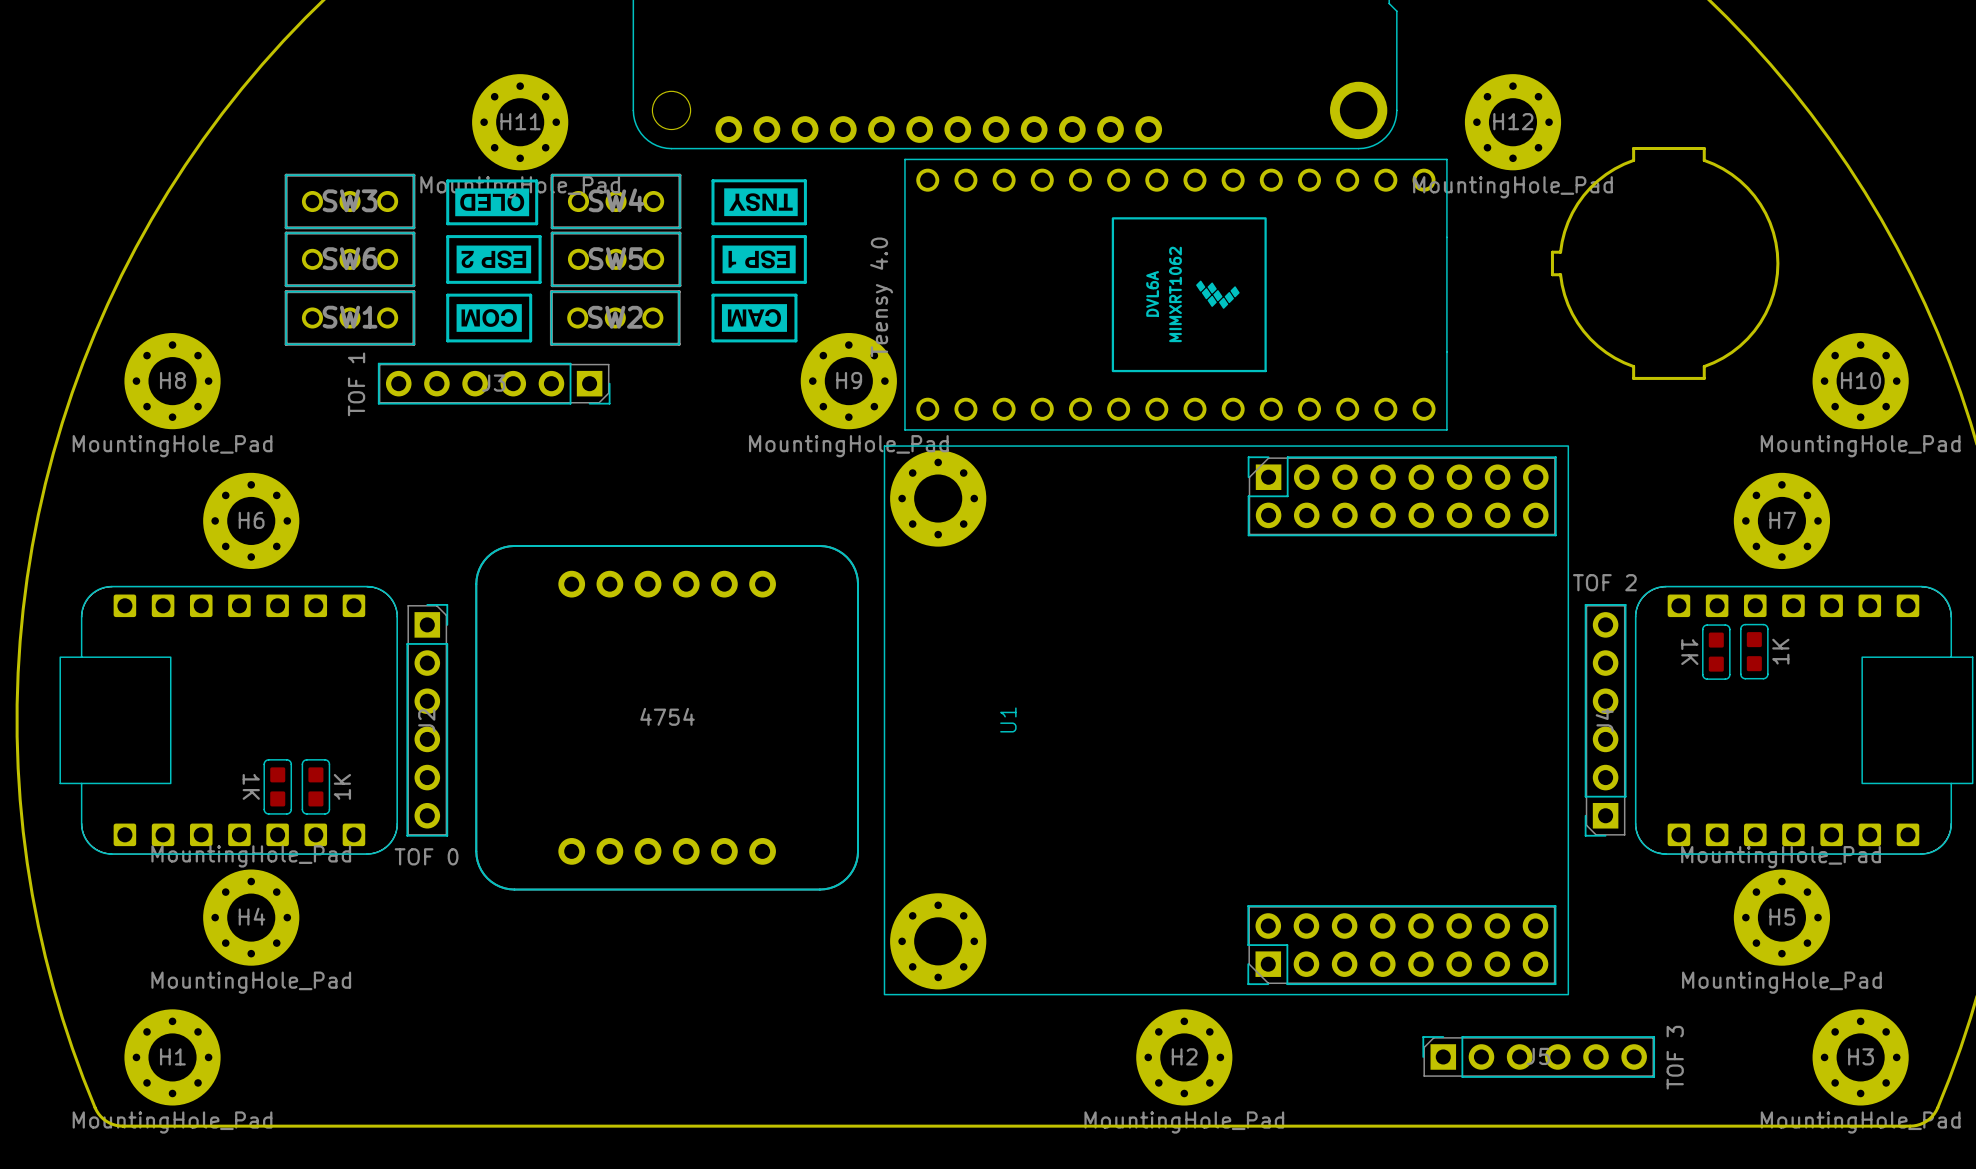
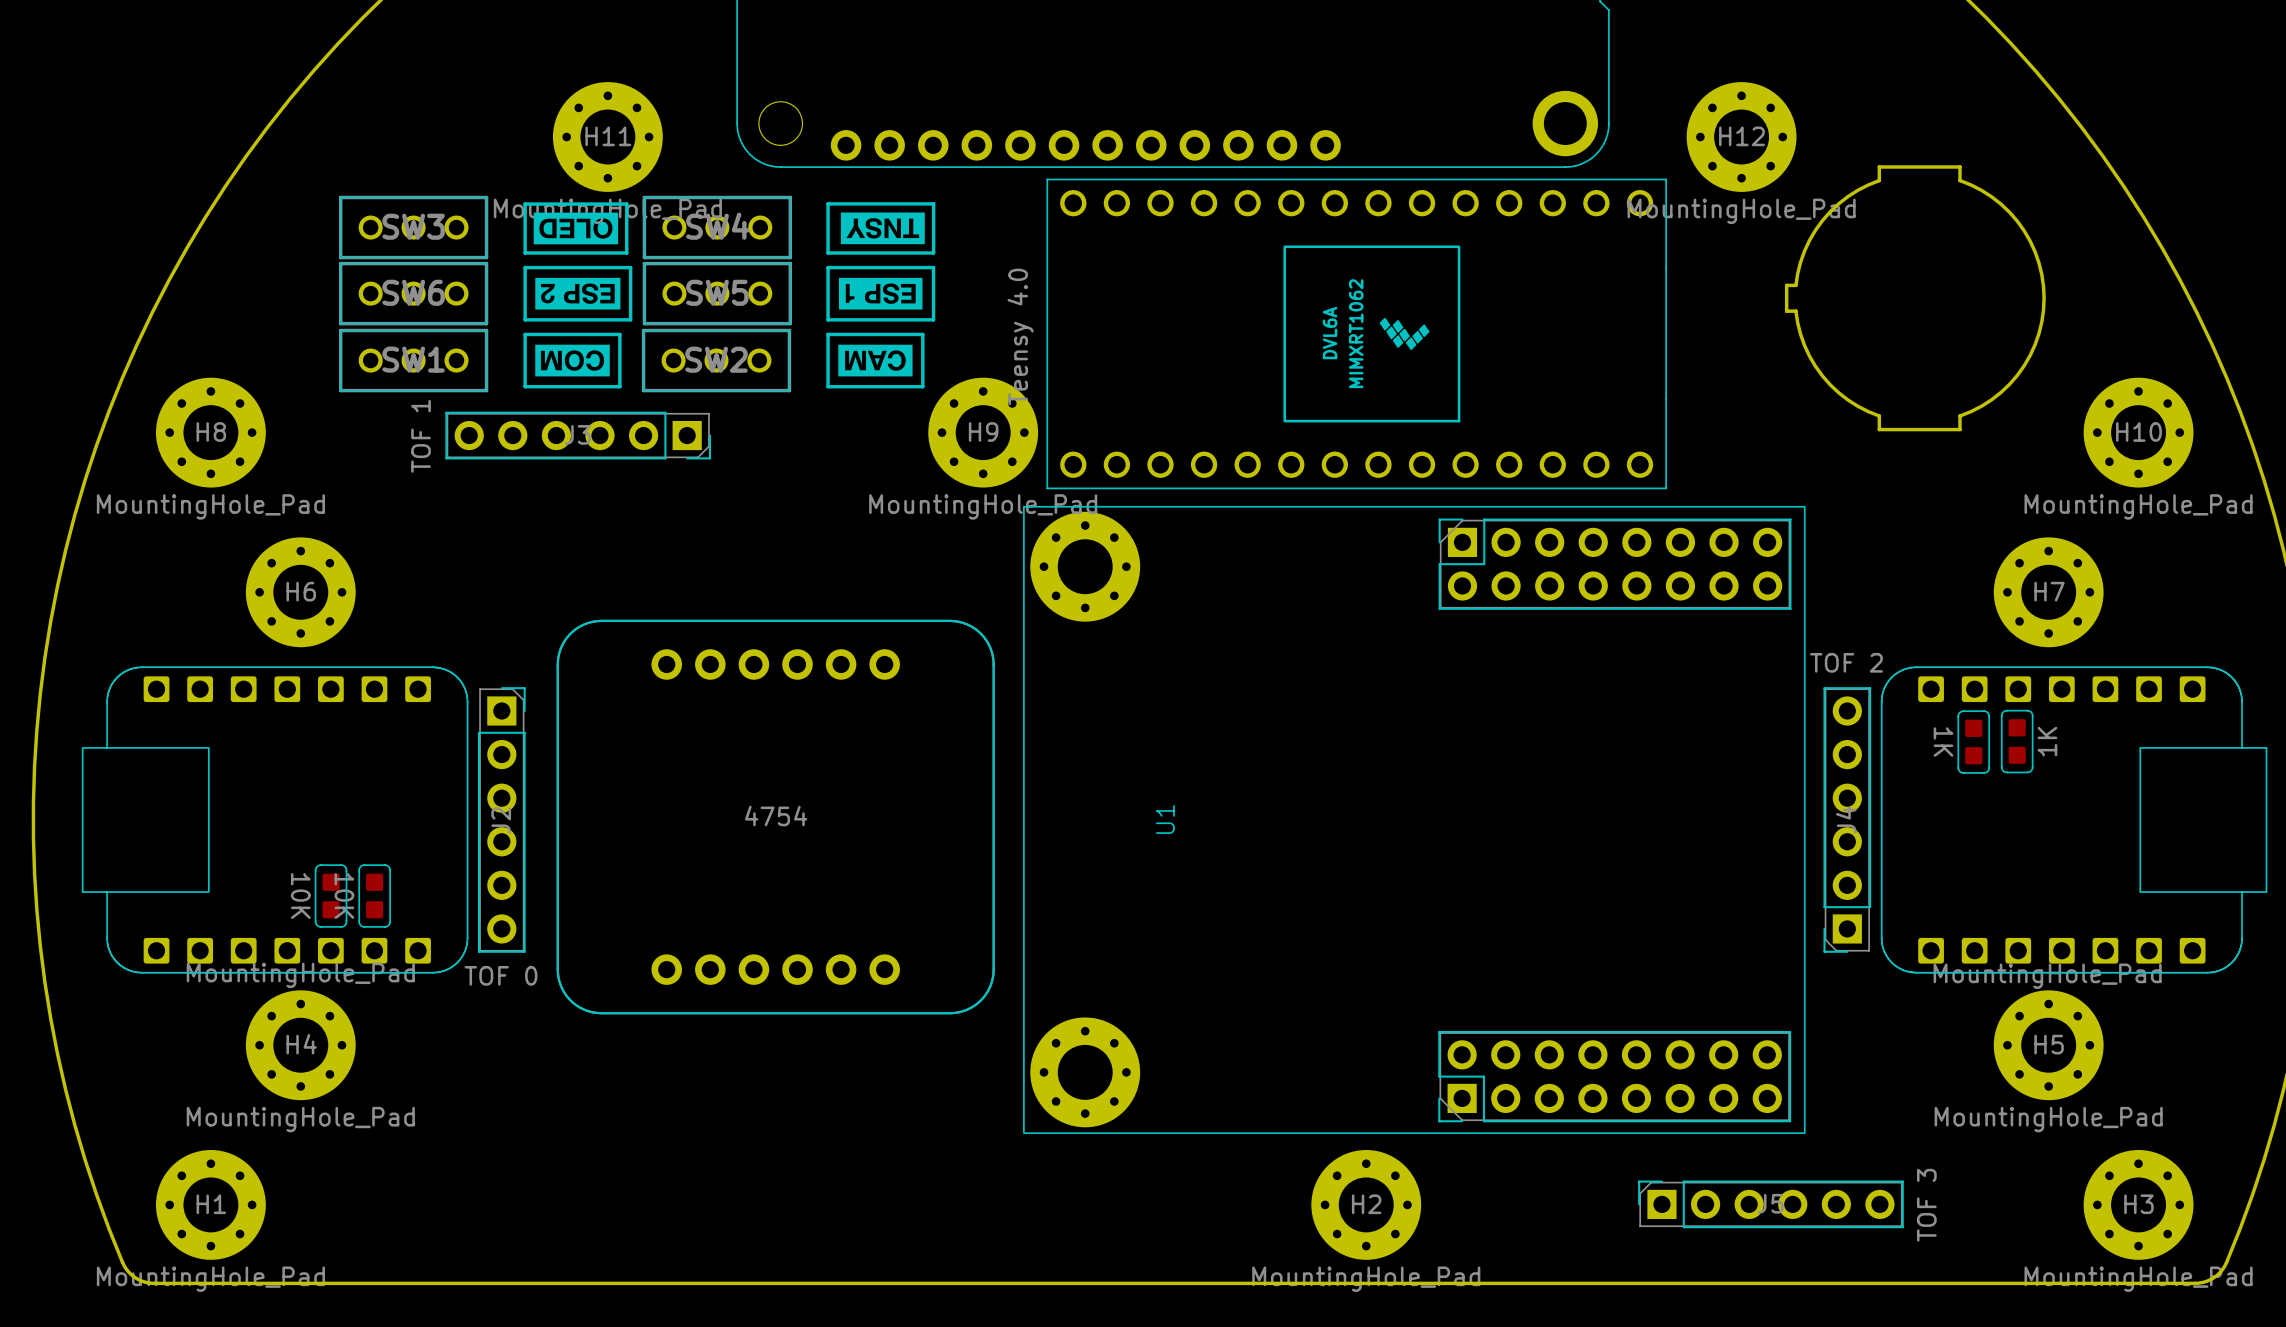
part value: 1K (251, 786) -> 10K (300, 896)
part value: 1K (342, 786) -> 10K (344, 896)

